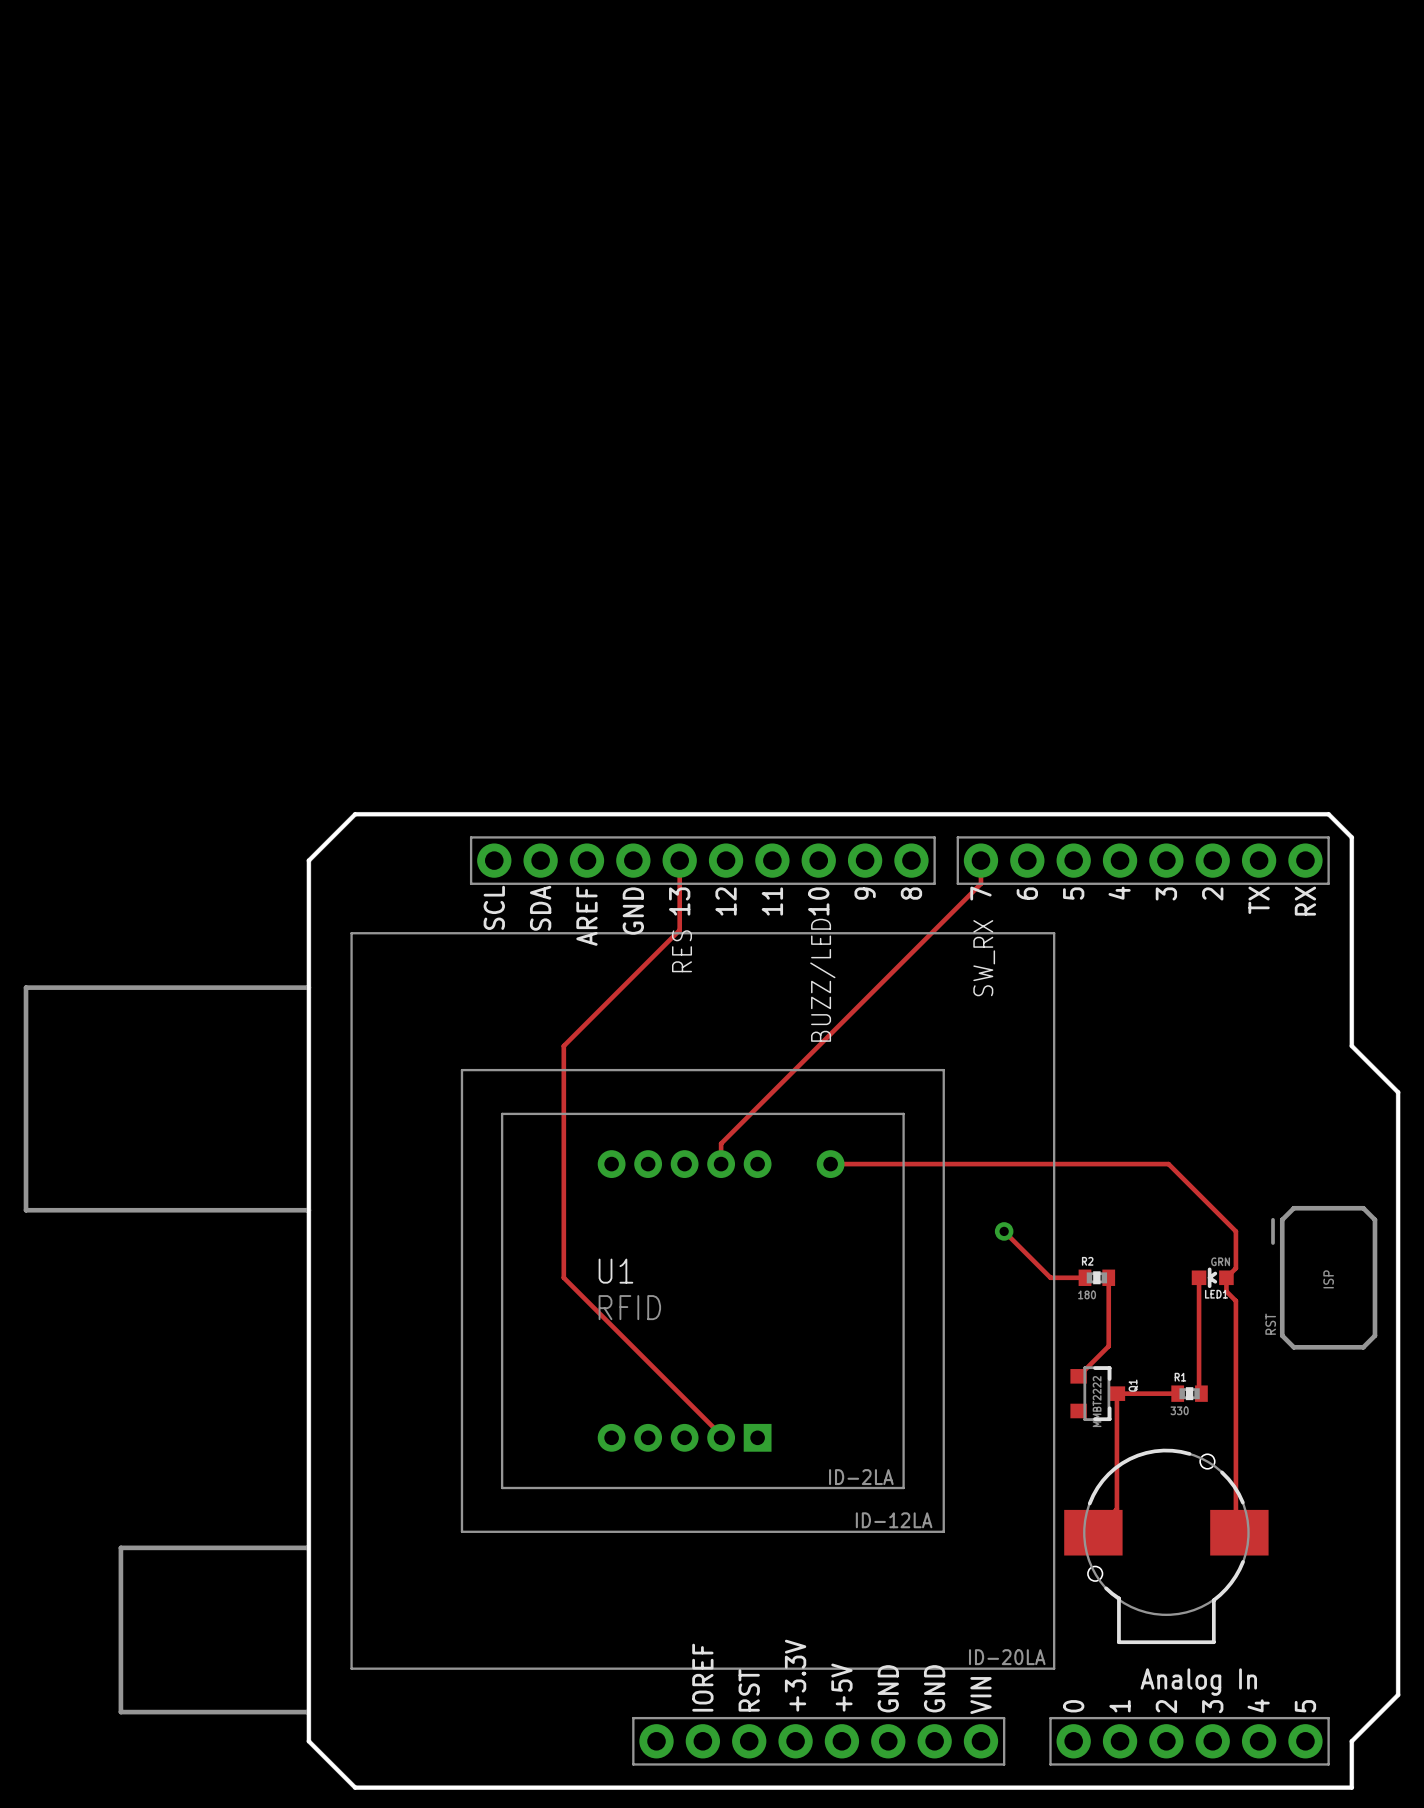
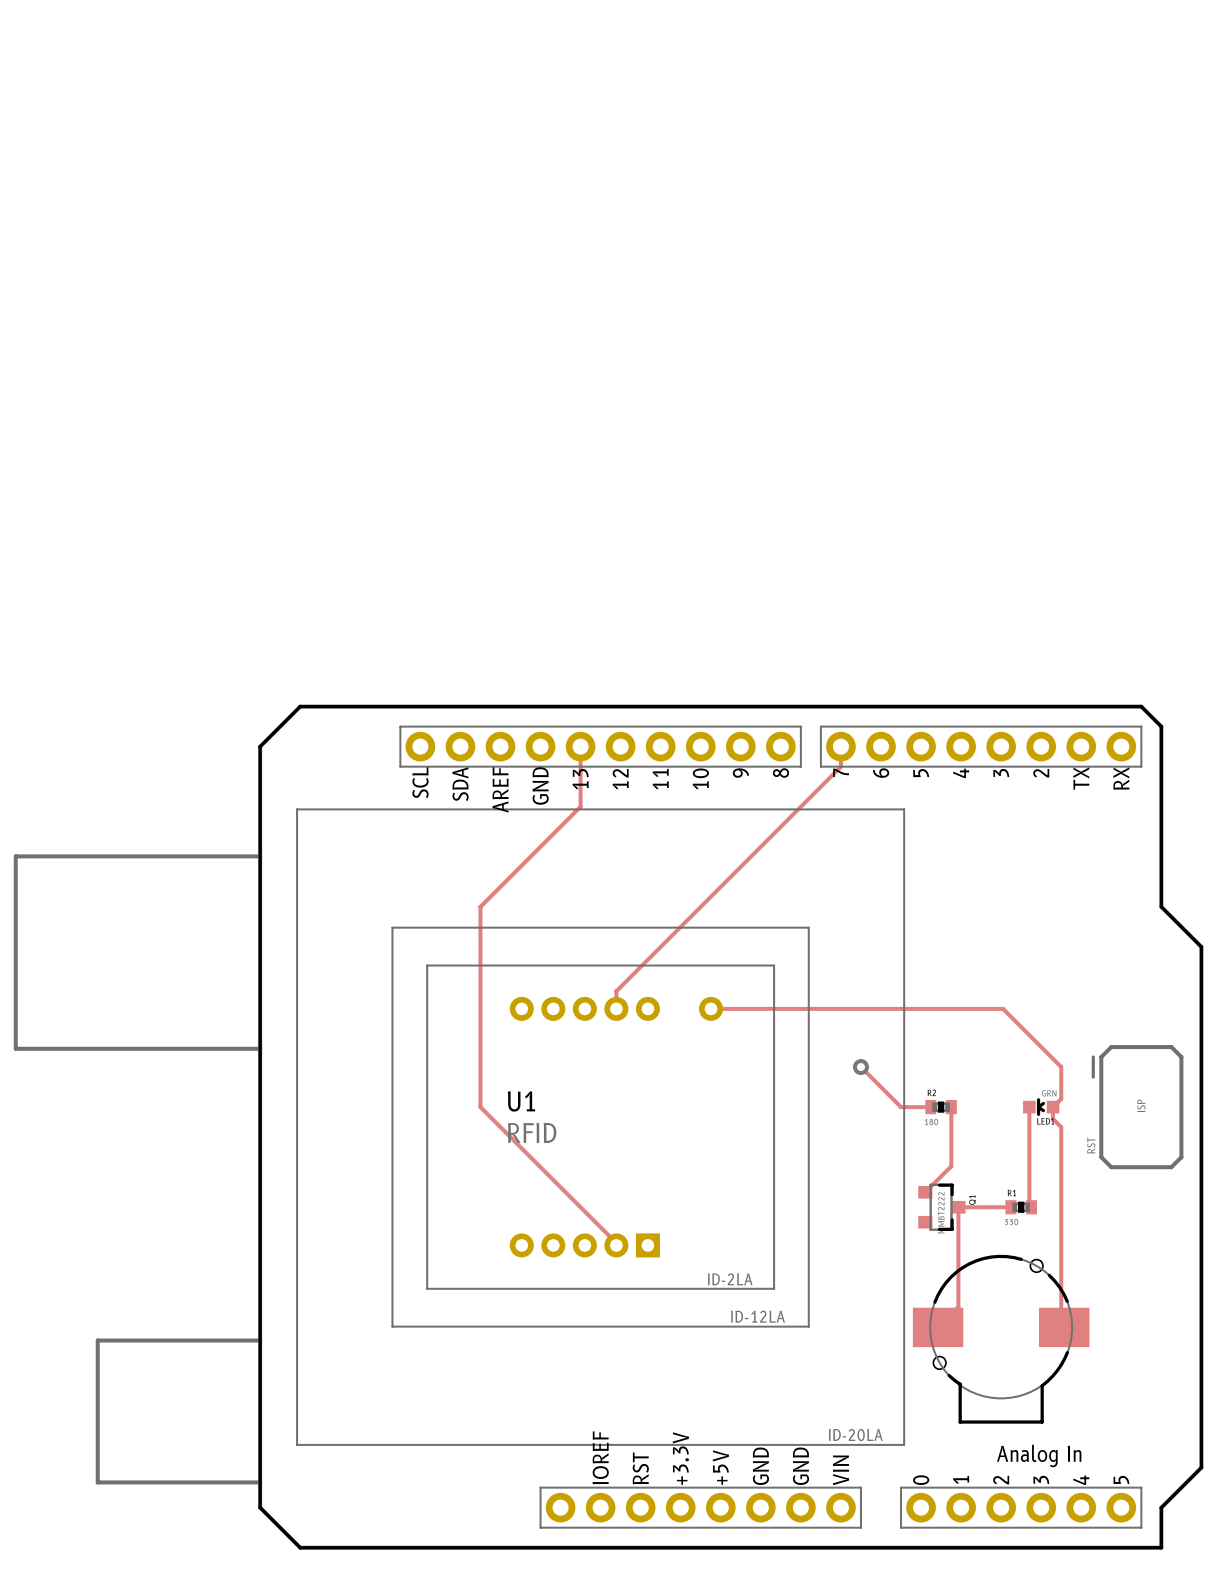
text: RES (682, 951) -> none
text: SW_RX (984, 958) -> none
text: BUZZ/LED (822, 980) -> none

